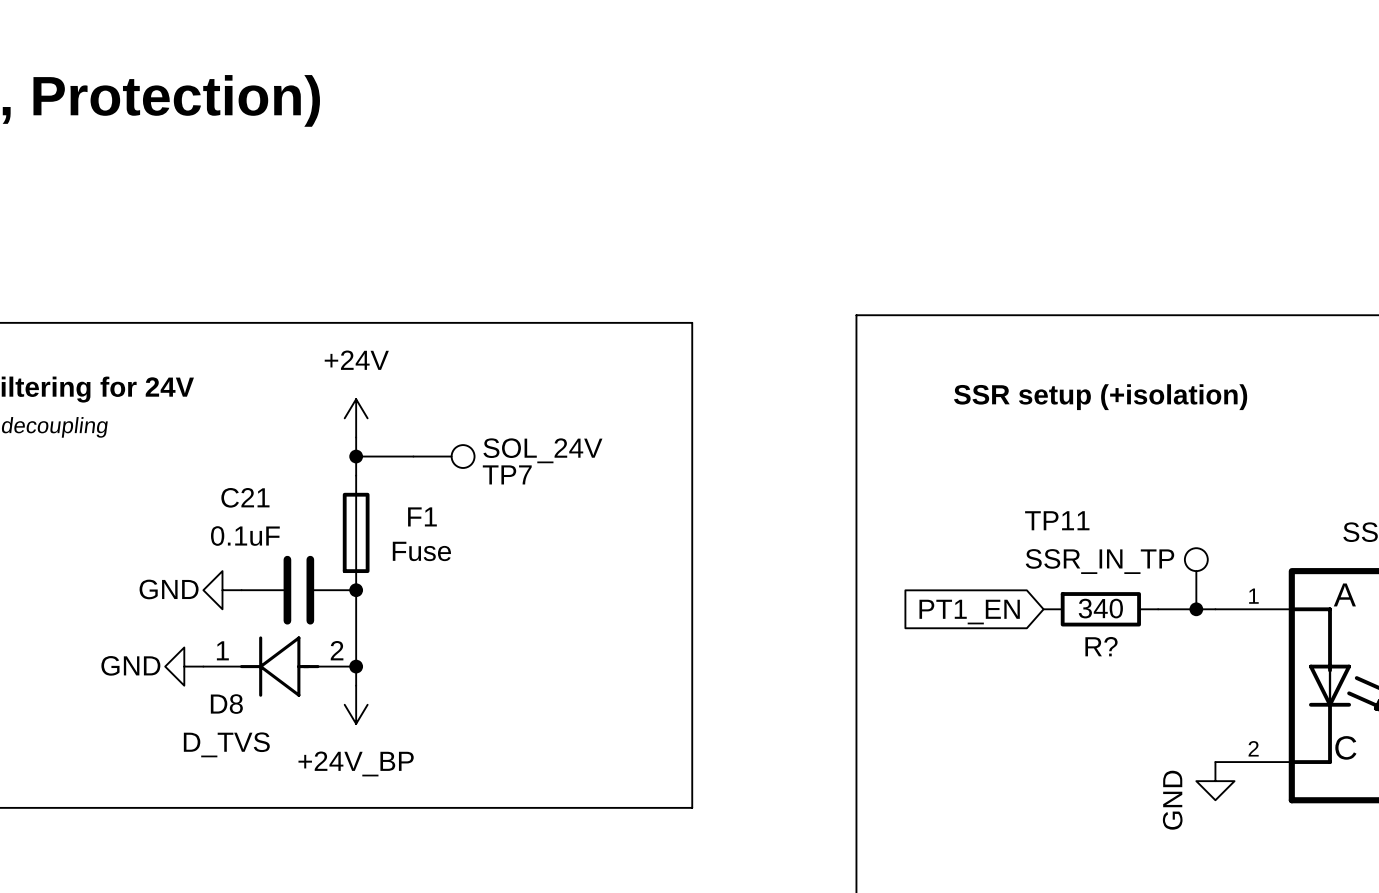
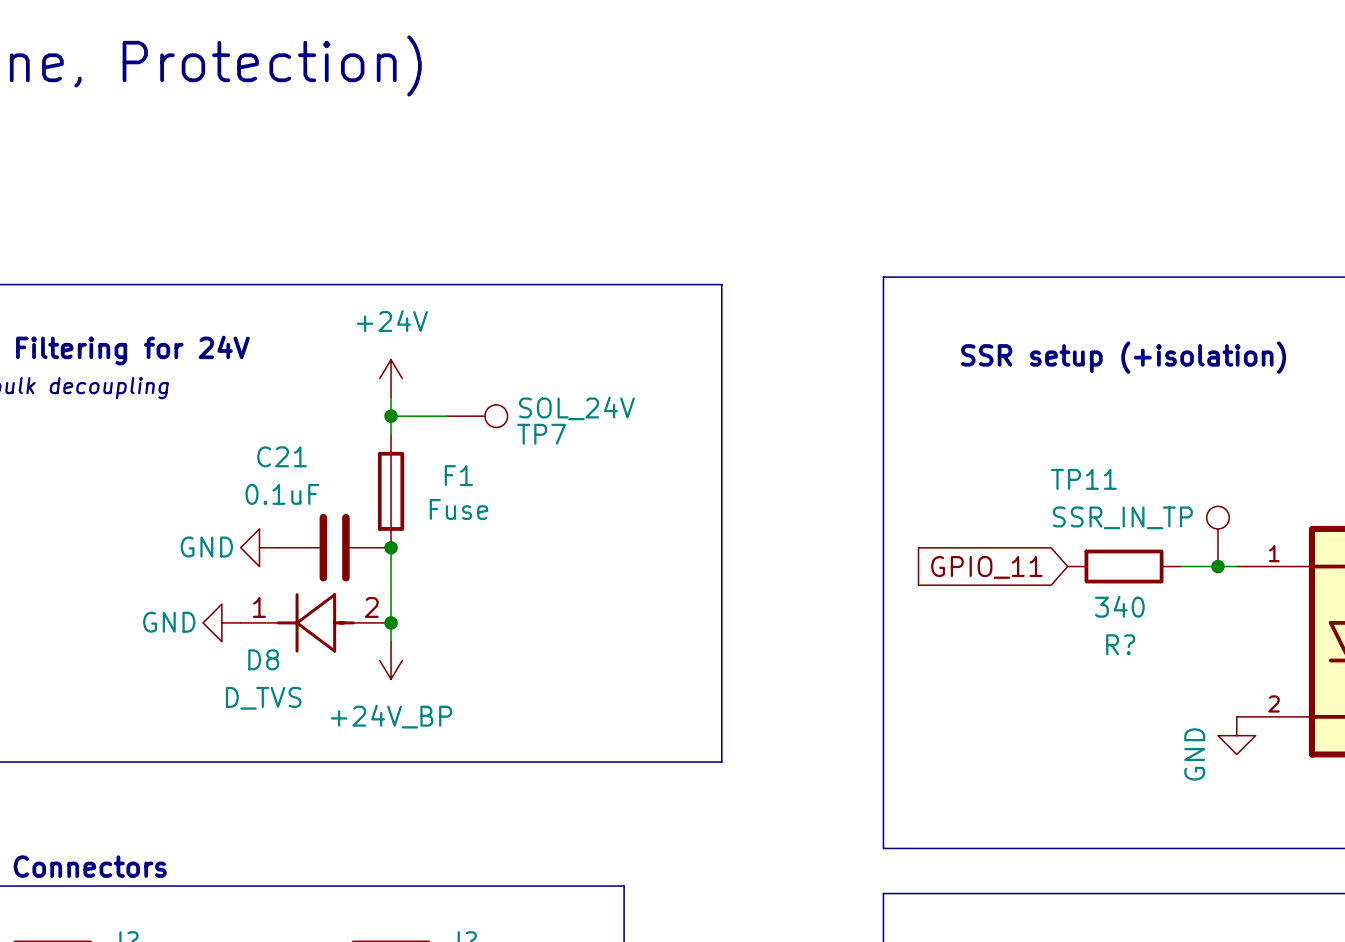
R? value position: 340 (1100, 608) -> 340 (1119, 606)
global label: PT1_EN (969, 612) -> GPIO_11 (986, 567)
R? name position: R? (1101, 646) -> R? (1120, 644)

